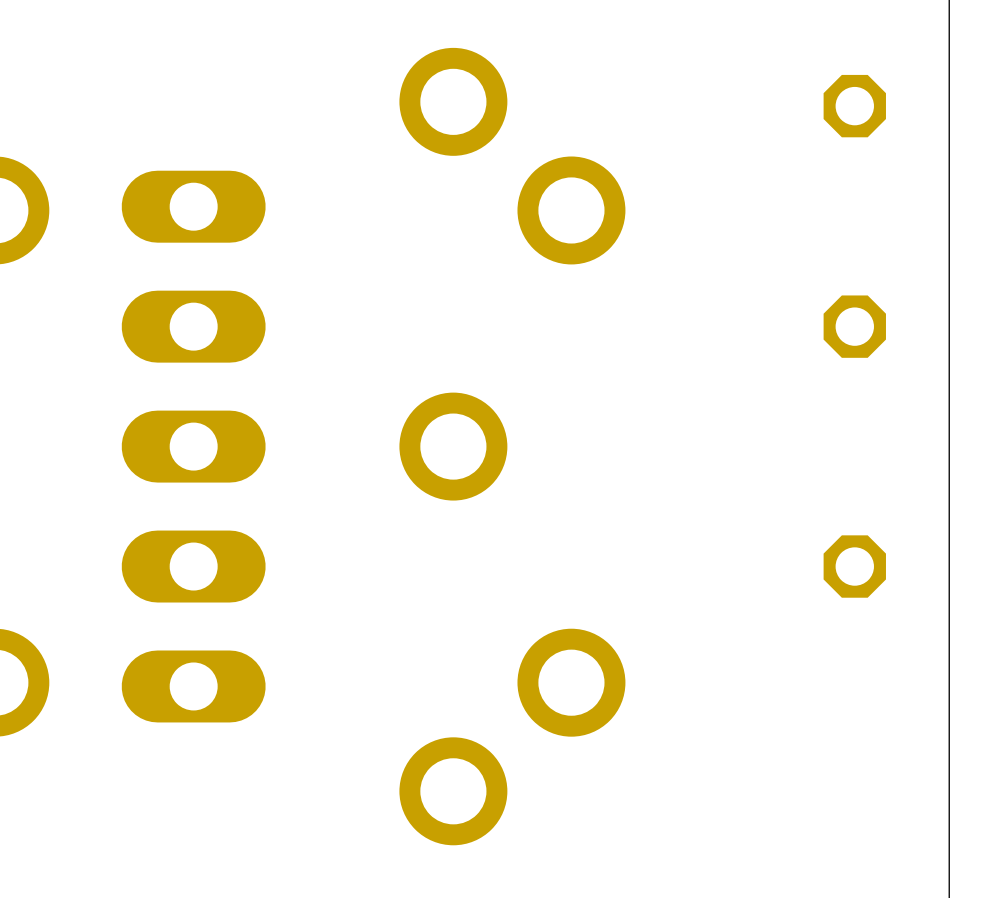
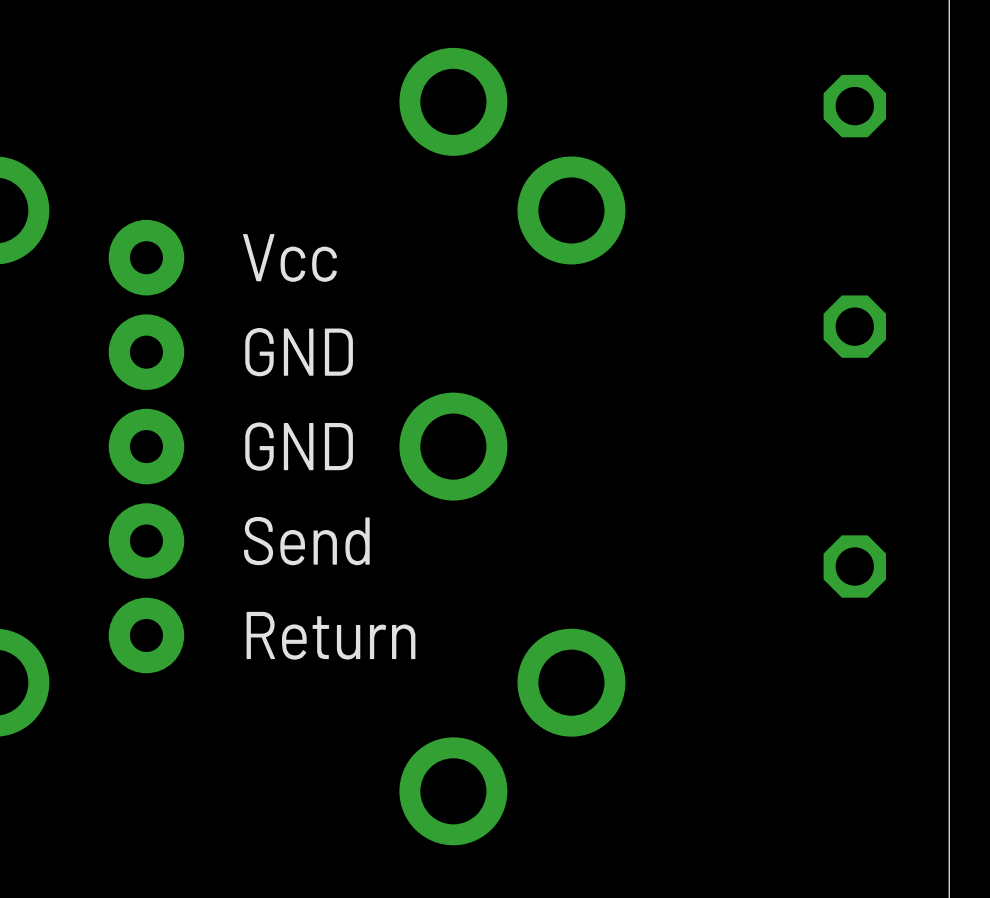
part footprint: [121, 170, 266, 723] -> [108, 219, 185, 674]
text: none -> Vcc (289, 257)
text: none -> GND (299, 352)
text: none -> GND (299, 446)
text: none -> Send (306, 541)
text: none -> Return (331, 635)

